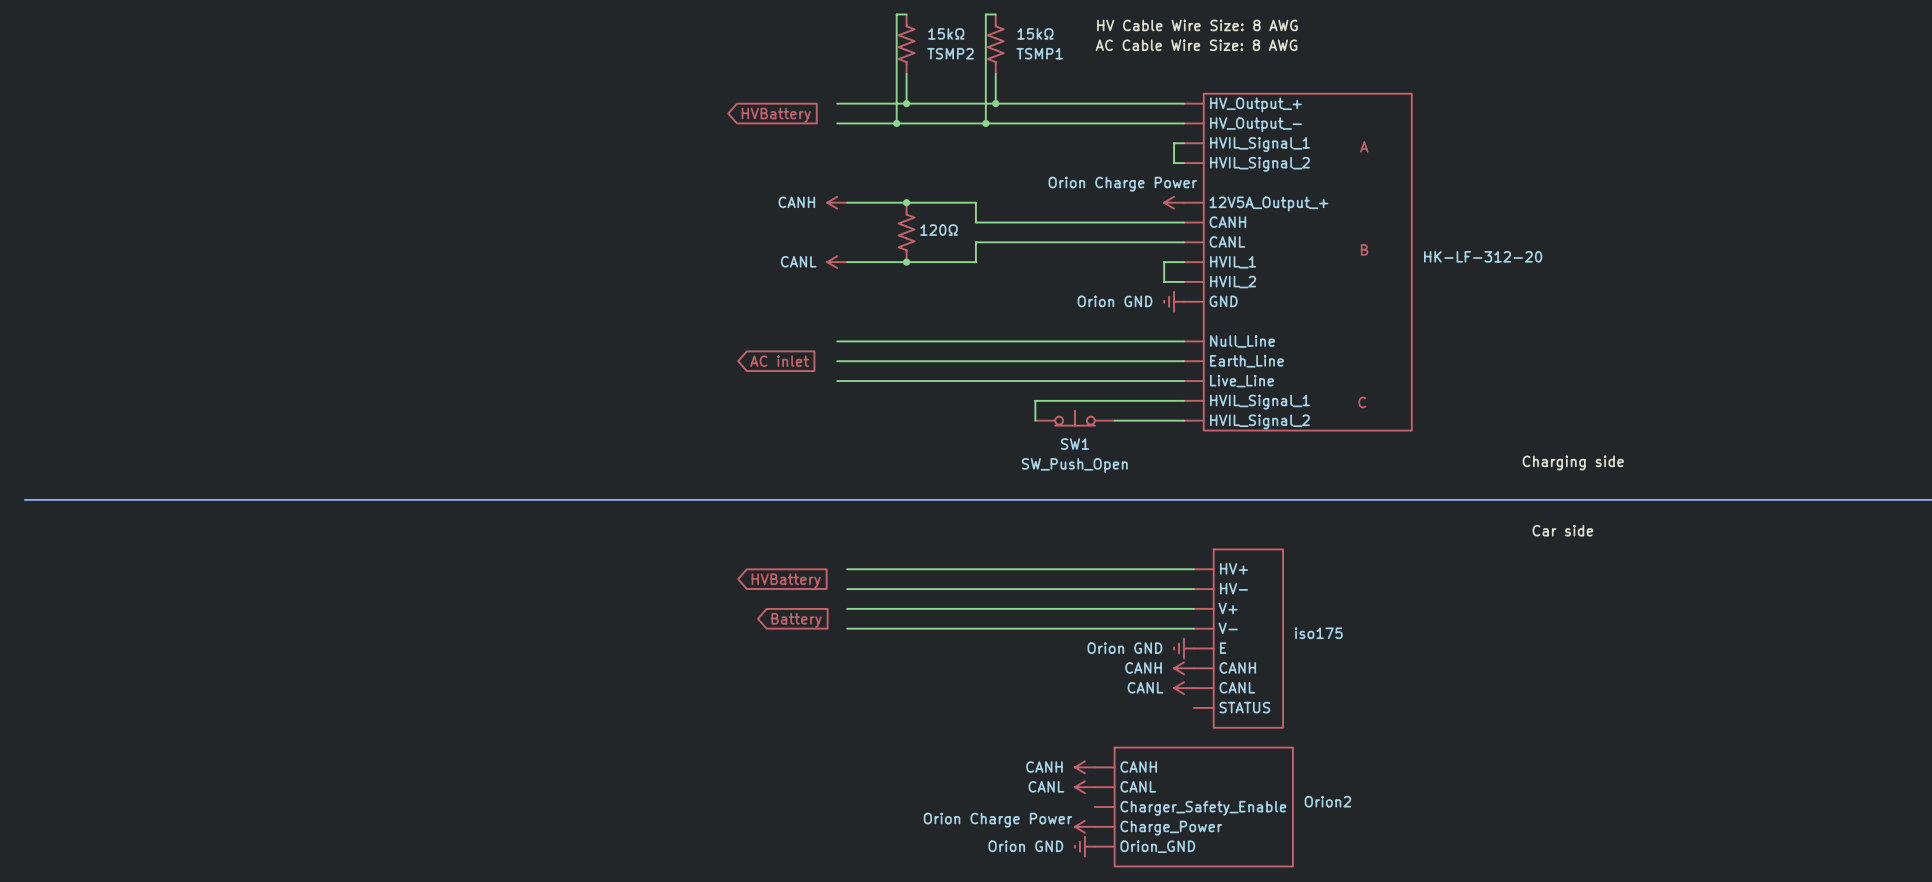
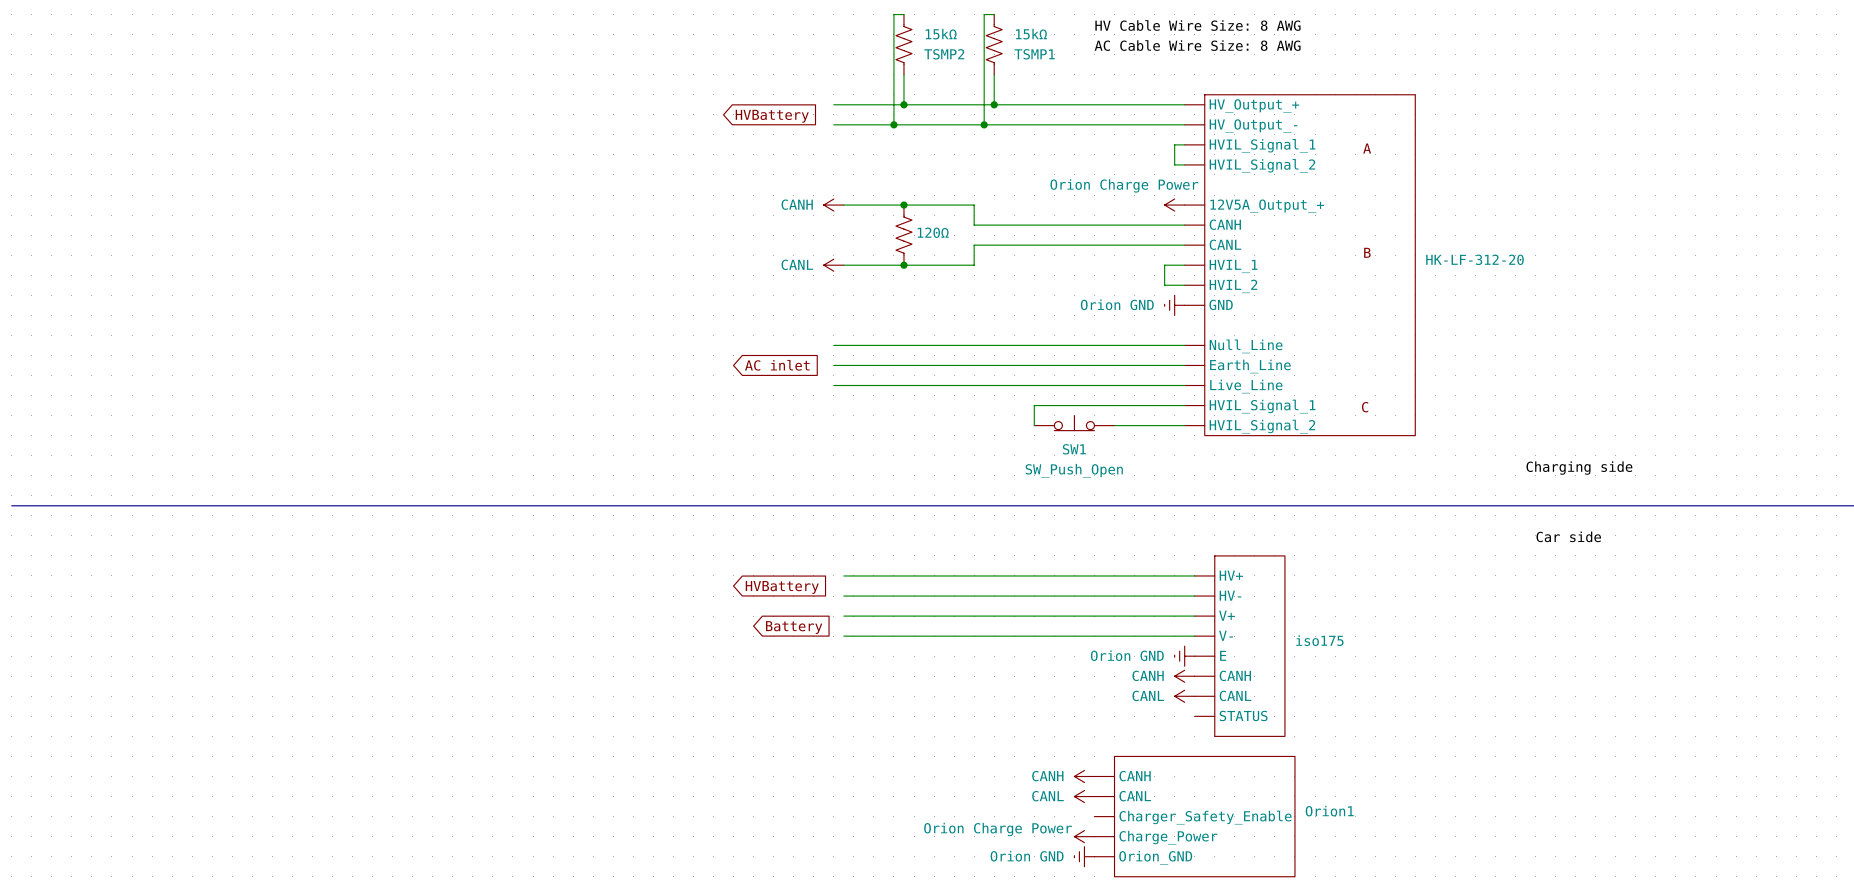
Orion2 name: Orion2 (1327, 801) -> Orion1 (1329, 811)

